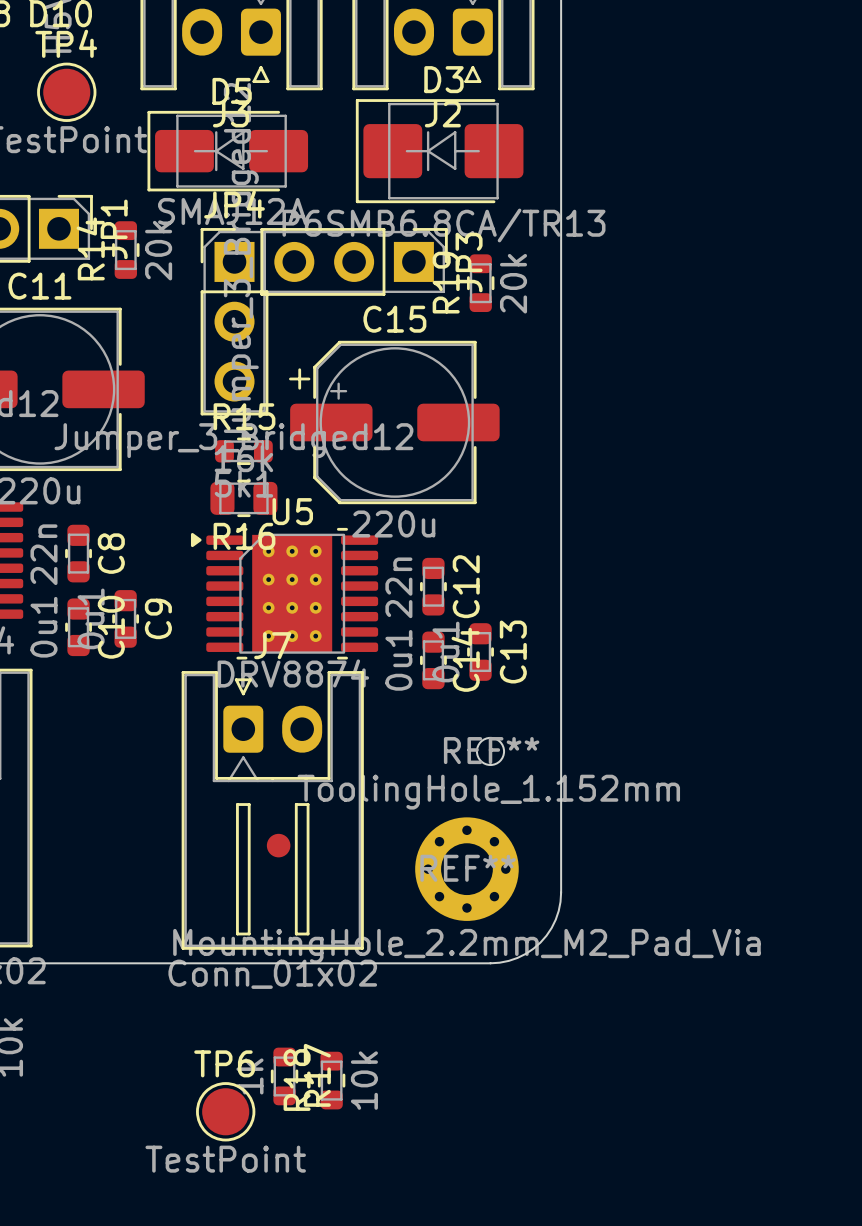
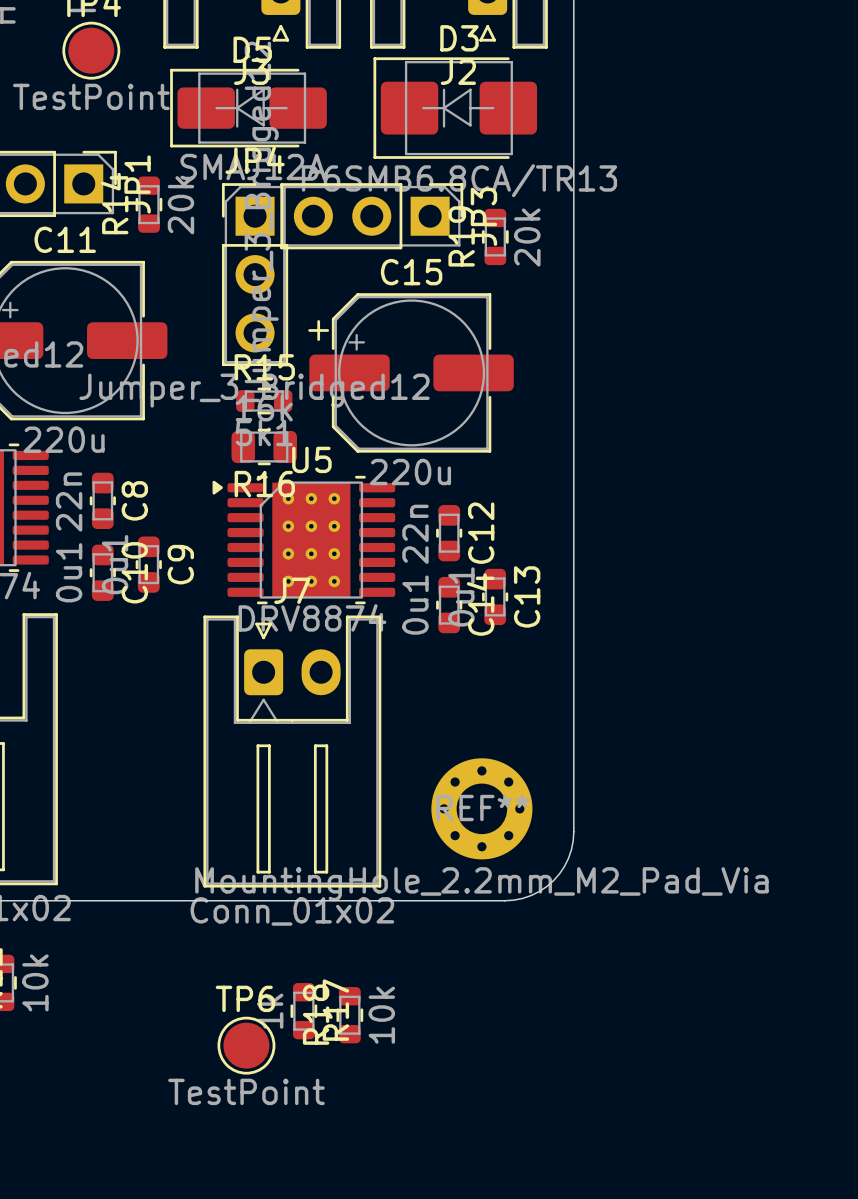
REF**: ToolingHole_1.152mm (490, 751) -> none
part: (278, 845) -> none

